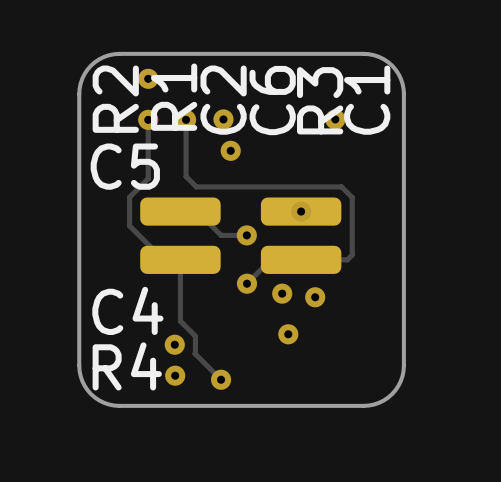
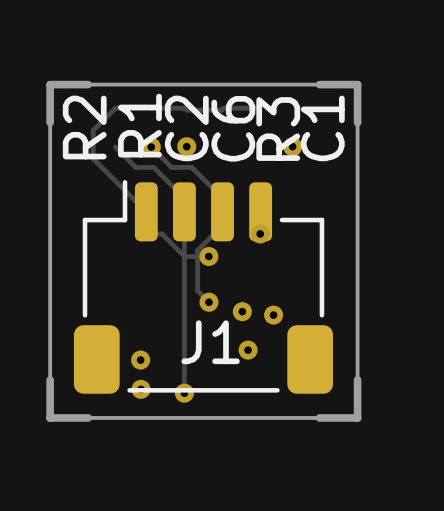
board edge: (119, 53) (104, 56) (91, 65) (82, 78) (79, 94) -> (88, 84) (50, 84) (50, 122)
board edge: (363, 53) (379, 56) (392, 65) (400, 78) (403, 94) -> (319, 84) (357, 84) (357, 122)
via: (148, 78) -> none
track: none -> (257, 108) (223, 108) (221, 110) (115, 108) (93, 130) (93, 158) (146, 211)
track: (148, 119) (148, 178) (129, 197) (129, 225) (163, 259) (180, 259) (180, 321) (195, 336) (195, 353) -> (115, 147) (135, 167) (153, 167) (184, 198) (184, 393)
via: (148, 119) -> none
track: (186, 119) (186, 176) (196, 186) (341, 186) (352, 197) (352, 255) (347, 259) (270, 259) (246, 283) -> (151, 147) (171, 167) (191, 167) (222, 198) (222, 225) (197, 250) (197, 290) (205, 298)
via: (230, 150) -> none
C5: (125, 166) -> none
part: (240, 235) -> none
J1: none -> (203, 286)
C4: (127, 310) -> none
track: (195, 353) (221, 379) -> none
board edge: (79, 365) (82, 381) (91, 394) (104, 402) (119, 405) -> (50, 379) (50, 417) (88, 417)
board edge: (403, 365) (400, 381) (392, 394) (379, 402) (363, 405) -> (357, 379) (357, 417) (319, 417)
R4: (127, 366) -> none

